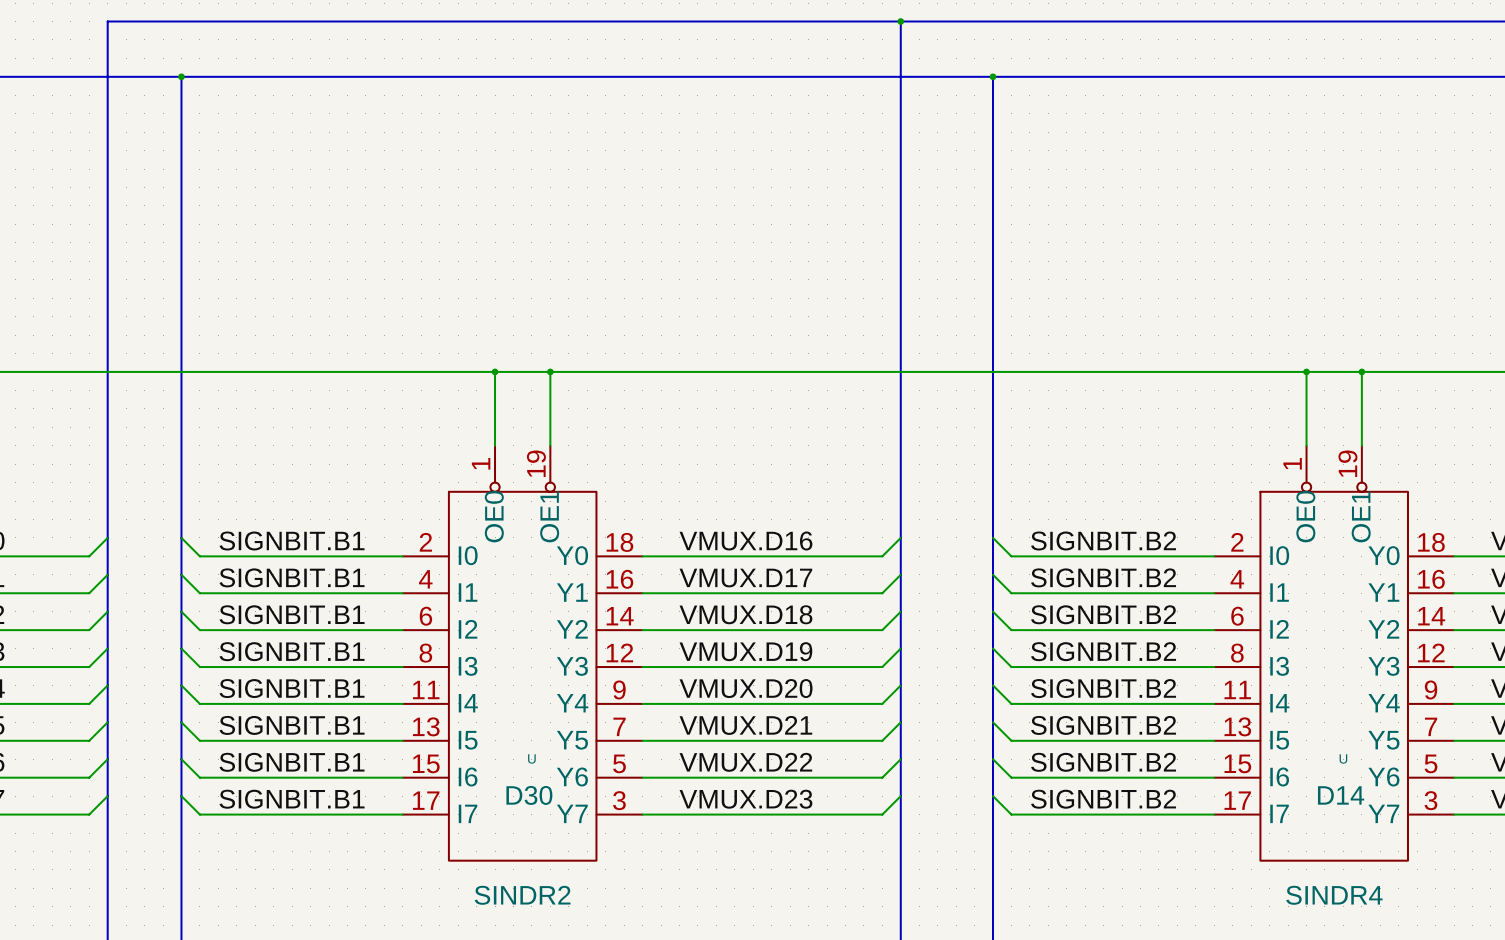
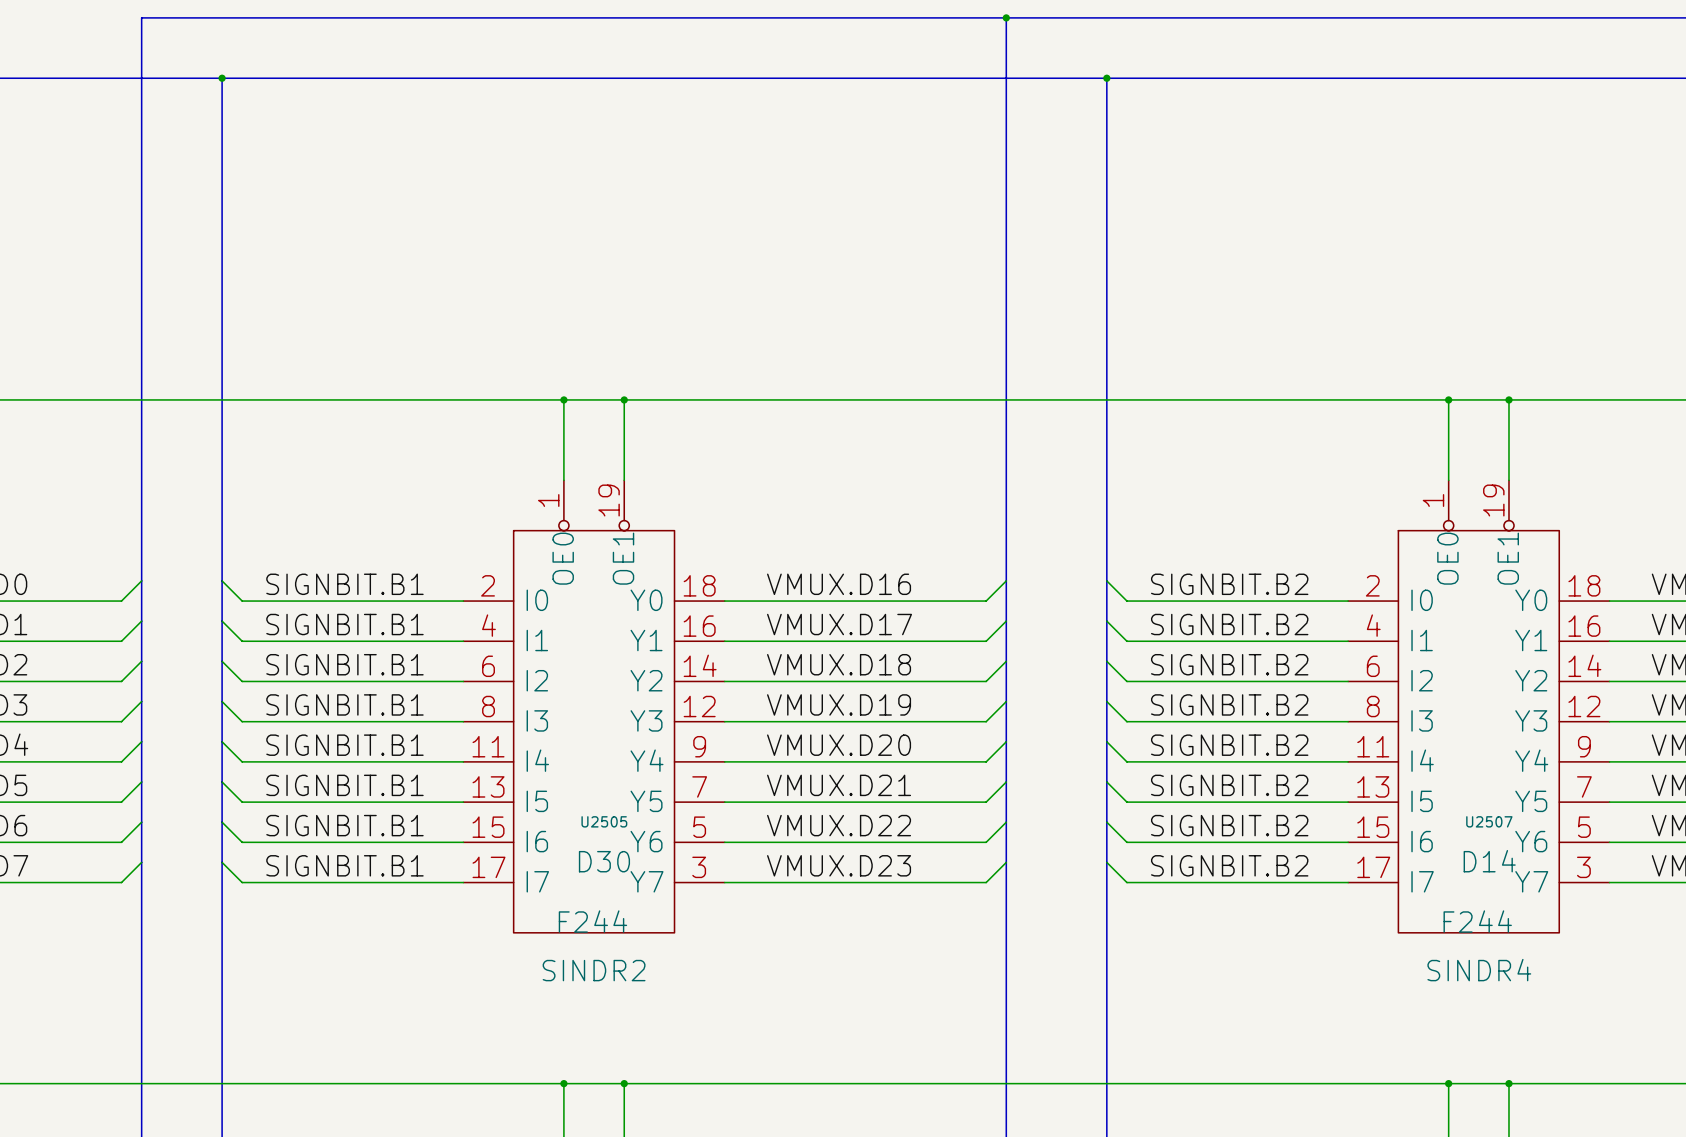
U name: U (531, 758) -> U2505 (604, 821)
U name: U (1343, 758) -> U2507 (1489, 821)
U value: none -> F244 (592, 921)
U value: none -> F244 (1477, 921)

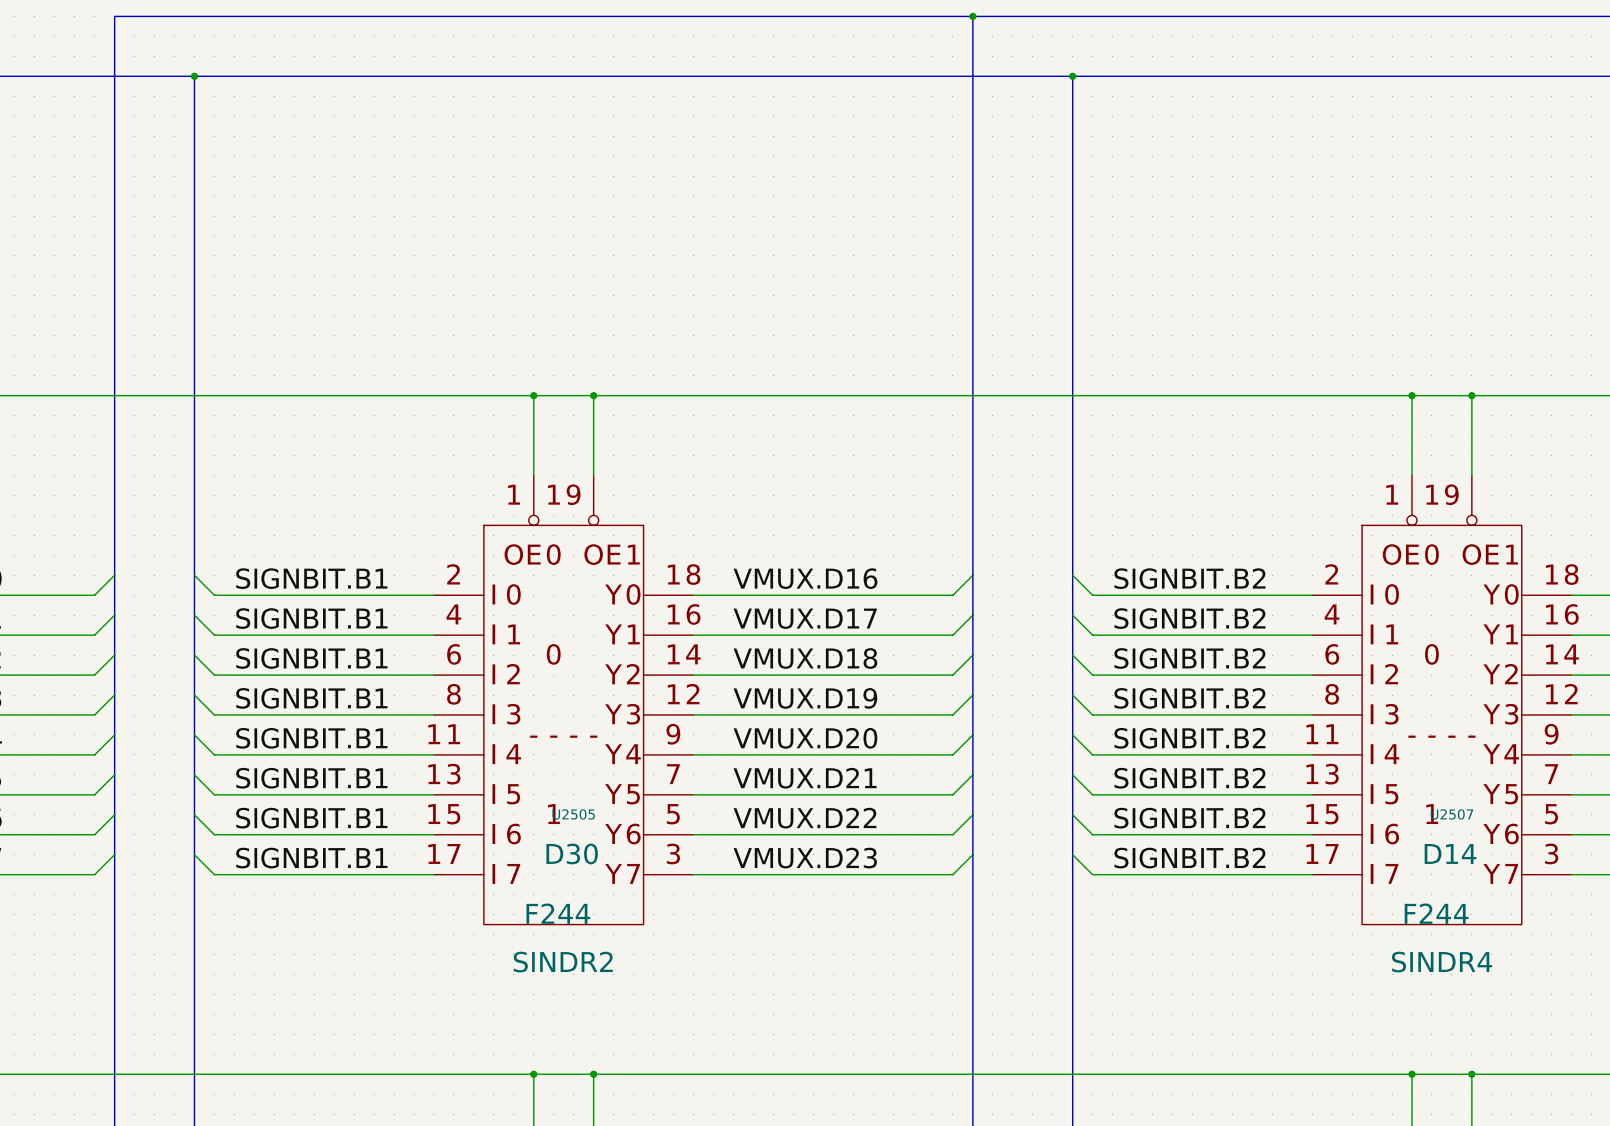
U2505 symbol: [463, 480, 725, 933] -> [433, 475, 694, 925]
U2507 symbol: [1348, 480, 1610, 933] -> [1312, 475, 1572, 925]

